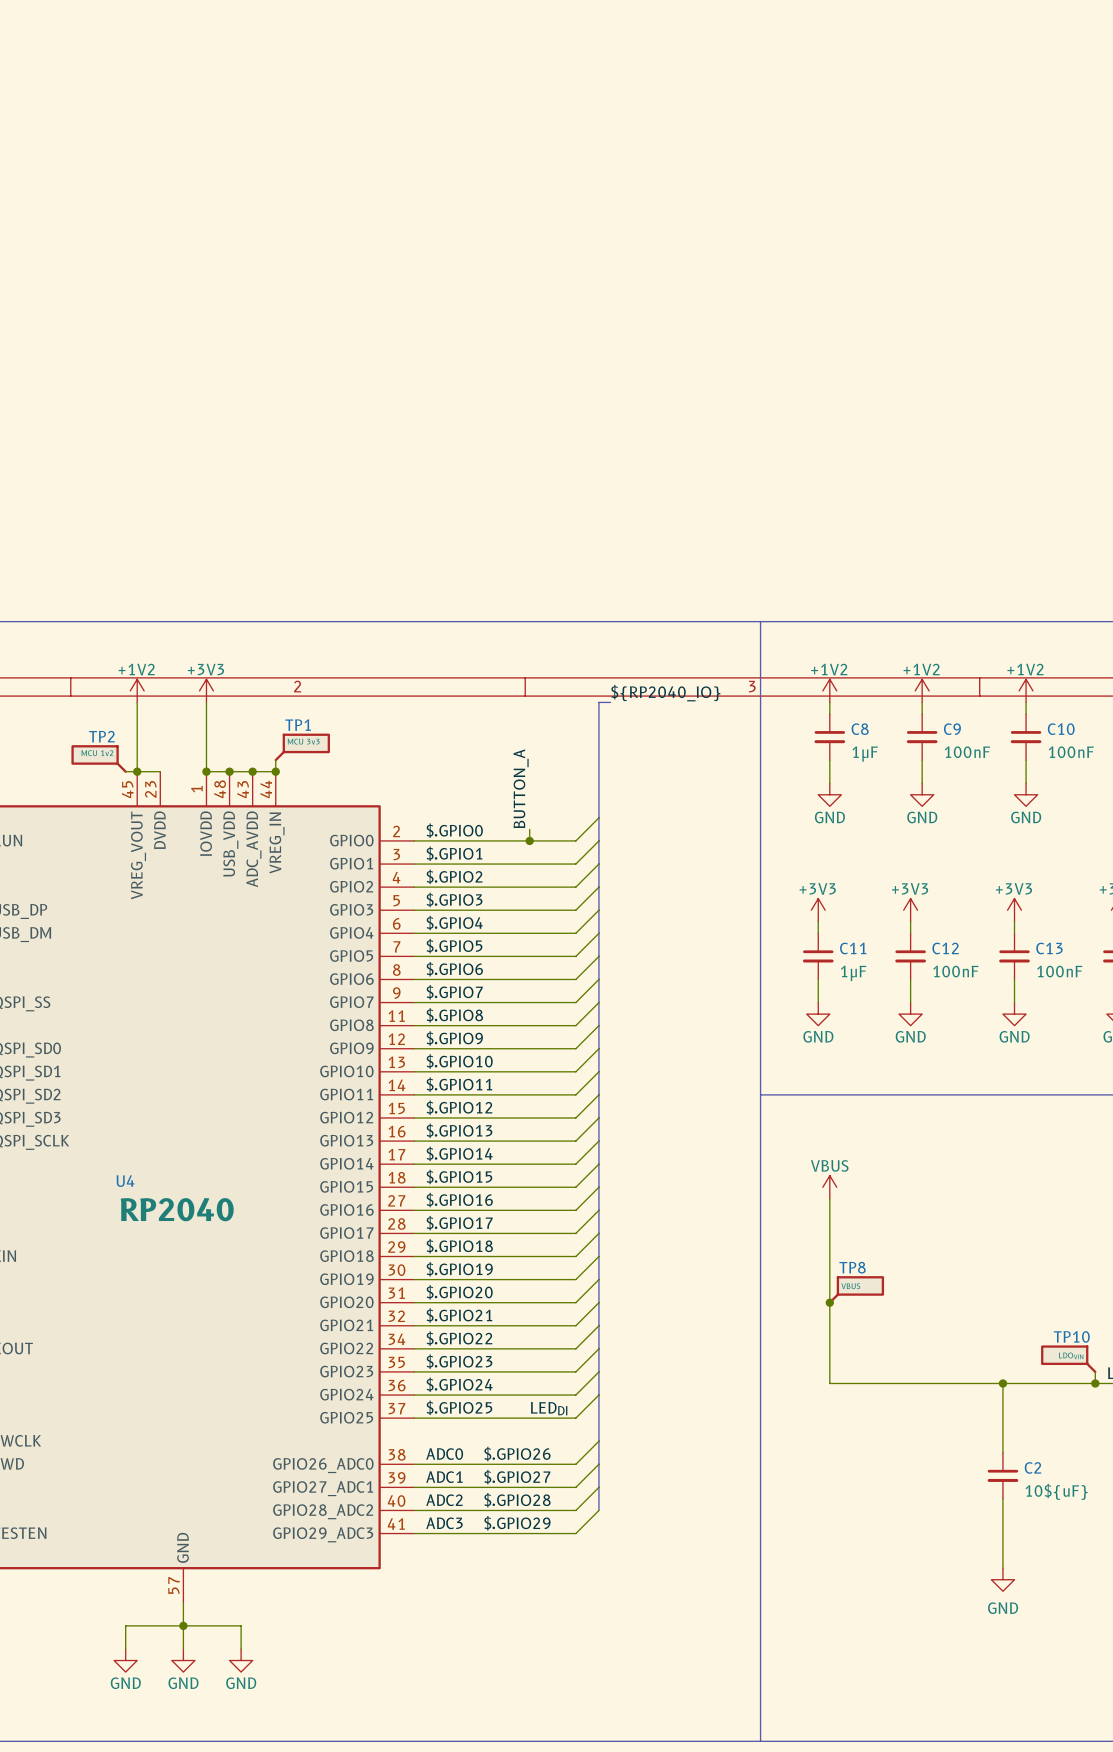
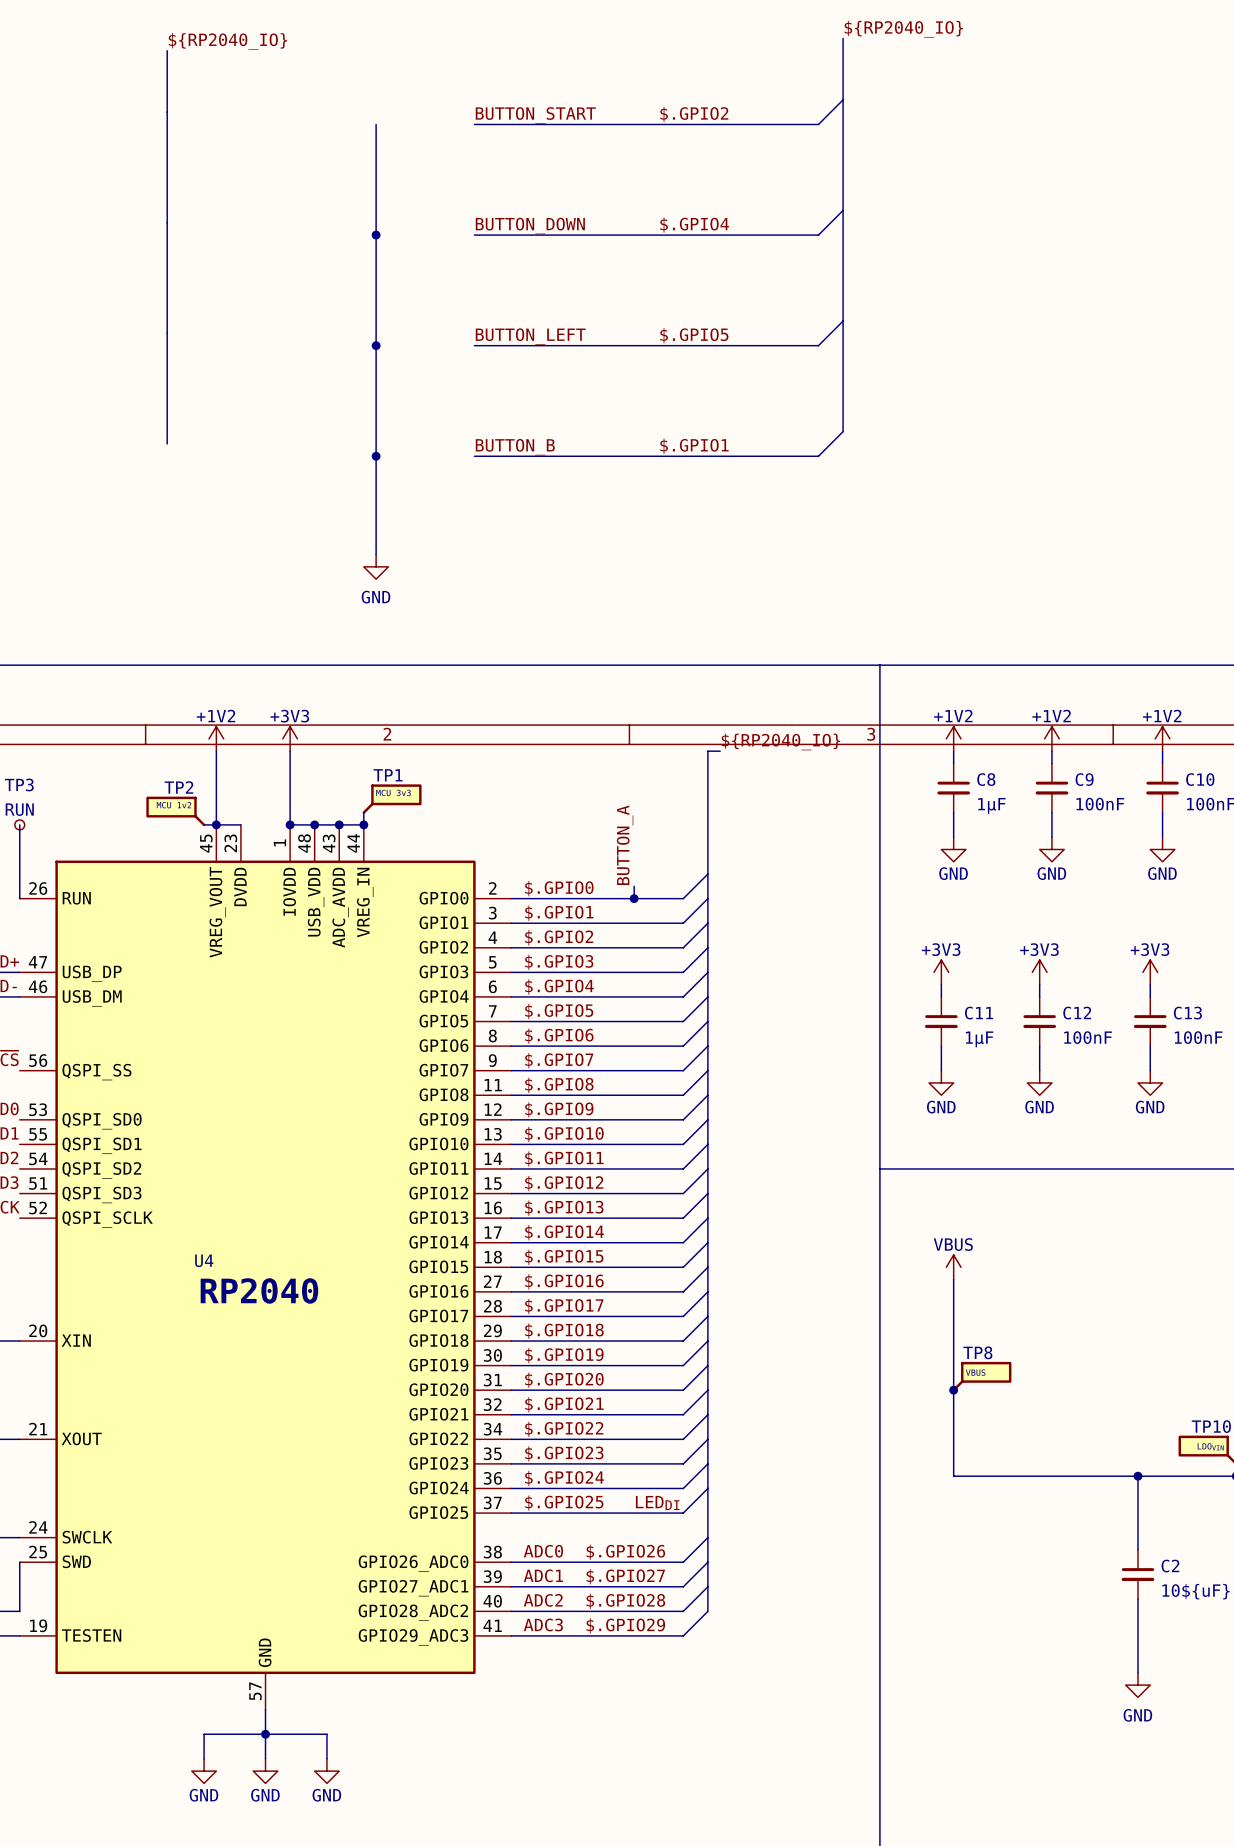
label: none -> ${RP2040_IO} (903, 29)
bus: none -> (843, 38) (843, 431)
label: none -> ${RP2040_IO} (227, 41)
bus: none -> (167, 50) (167, 443)
wire: none -> (843, 99) (818, 124) (474, 124)
label: none -> $.GPIO2 (694, 114)
label: none -> BUTTON_START (535, 115)
wire: none -> (376, 124) (376, 554)
wire: none -> (843, 210) (818, 235) (474, 235)
label: none -> $.GPIO4 (694, 225)
label: none -> BUTTON_DOWN (530, 225)
junction: none -> (376, 235)
wire: none -> (843, 321) (818, 345) (474, 345)
label: none -> $.GPIO5 (694, 335)
label: none -> BUTTON_LEFT (530, 336)
junction: none -> (376, 345)
wire: none -> (843, 431) (818, 456) (474, 456)
label: none -> $.GPIO1 (694, 446)
label: none -> BUTTON_B (515, 447)
junction: none -> (376, 456)
power symbol: none -> GND (376, 566)

